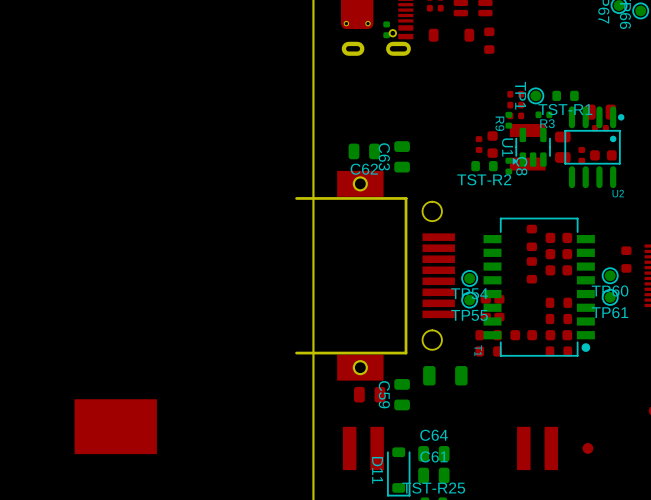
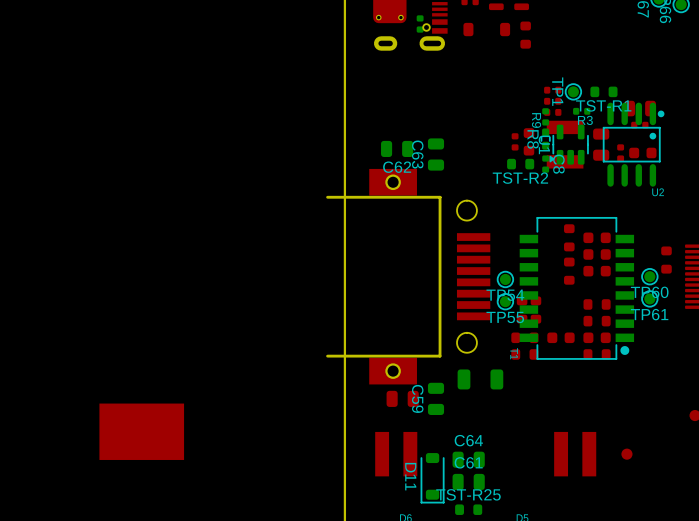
R8: none -> (545, 139)

